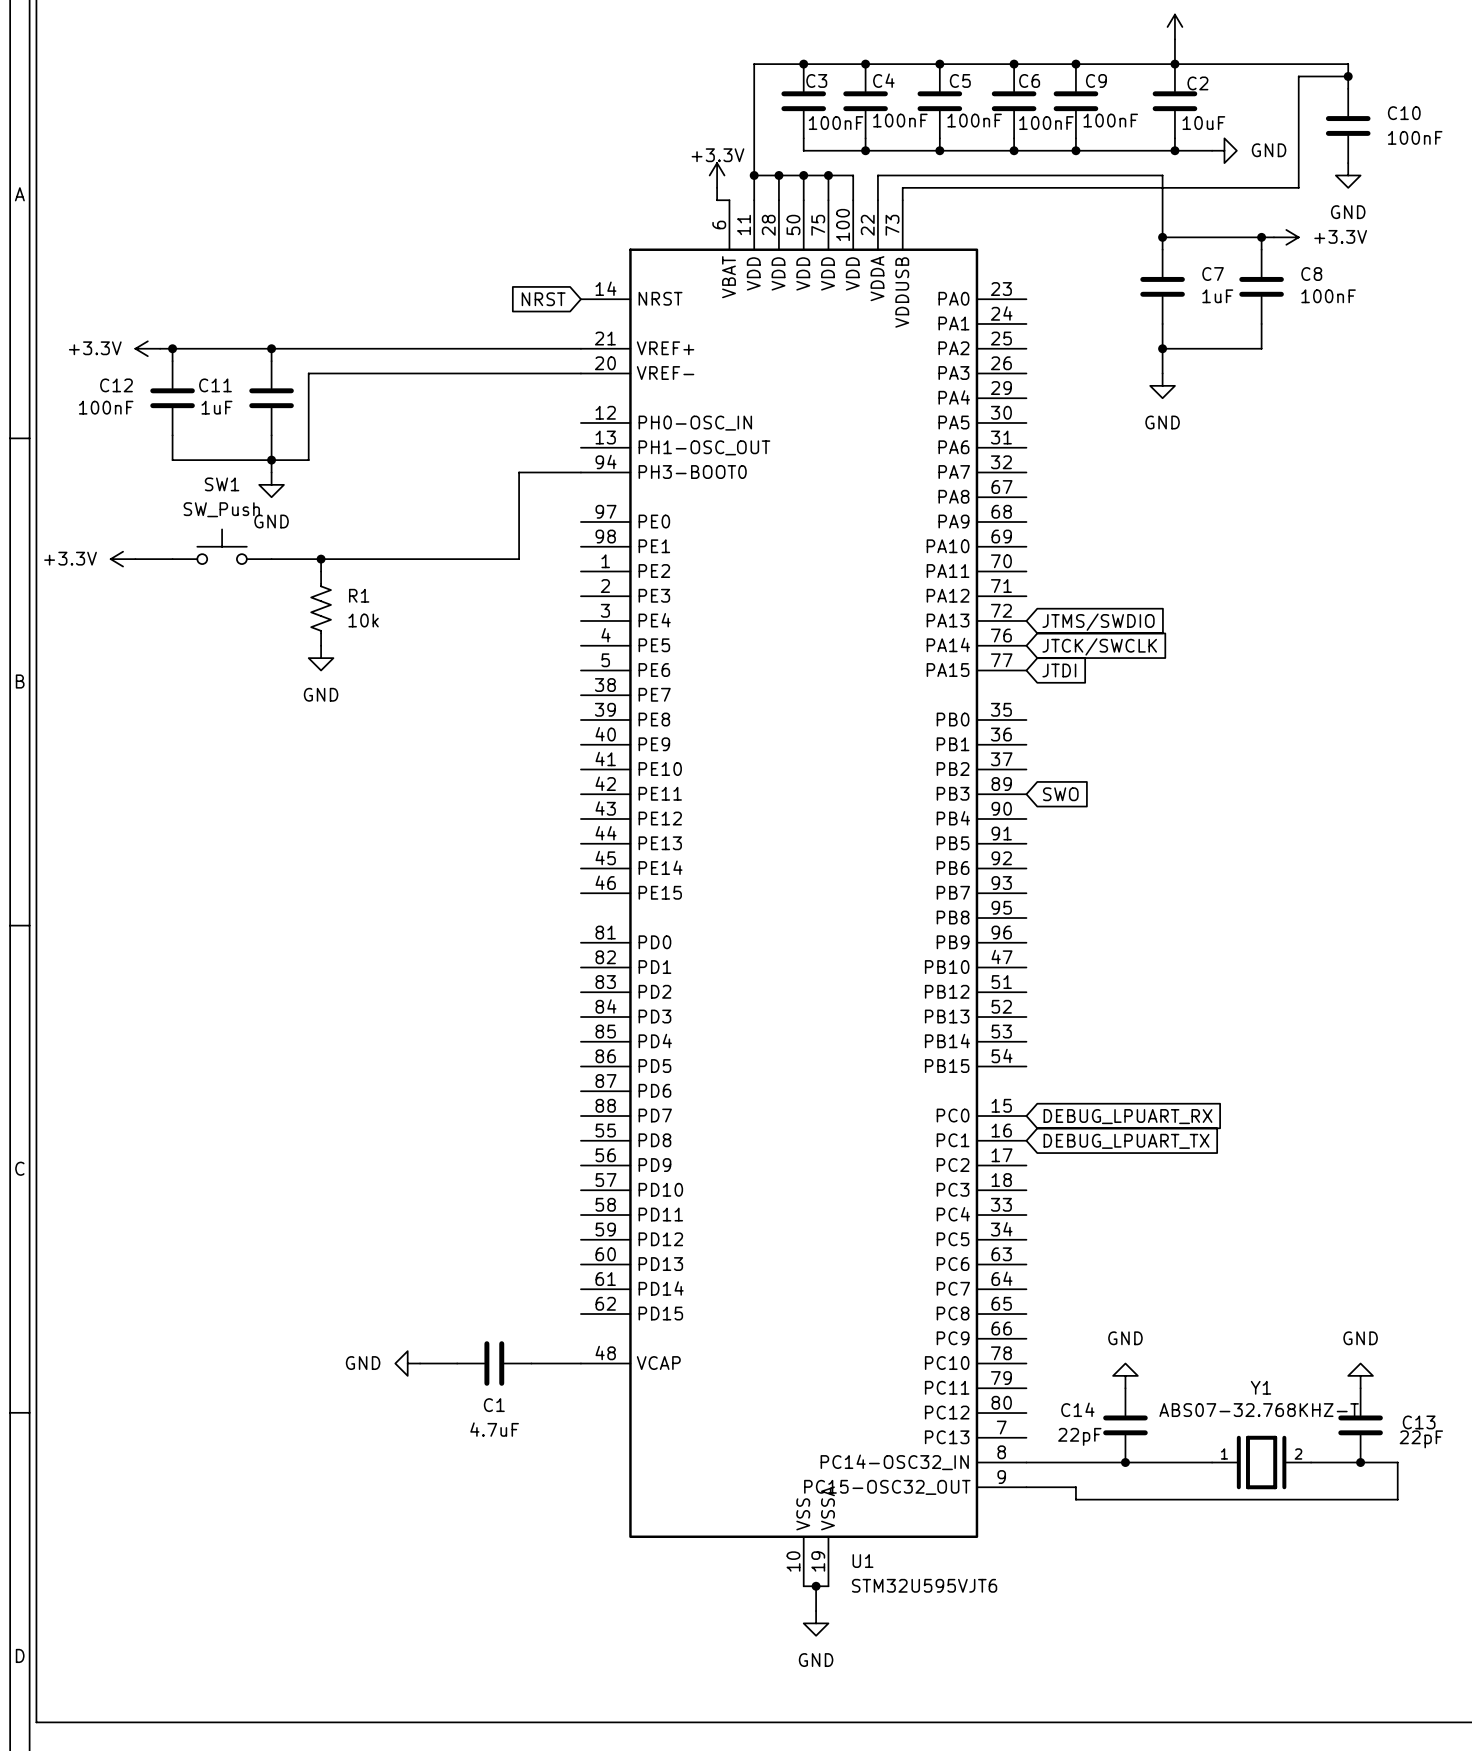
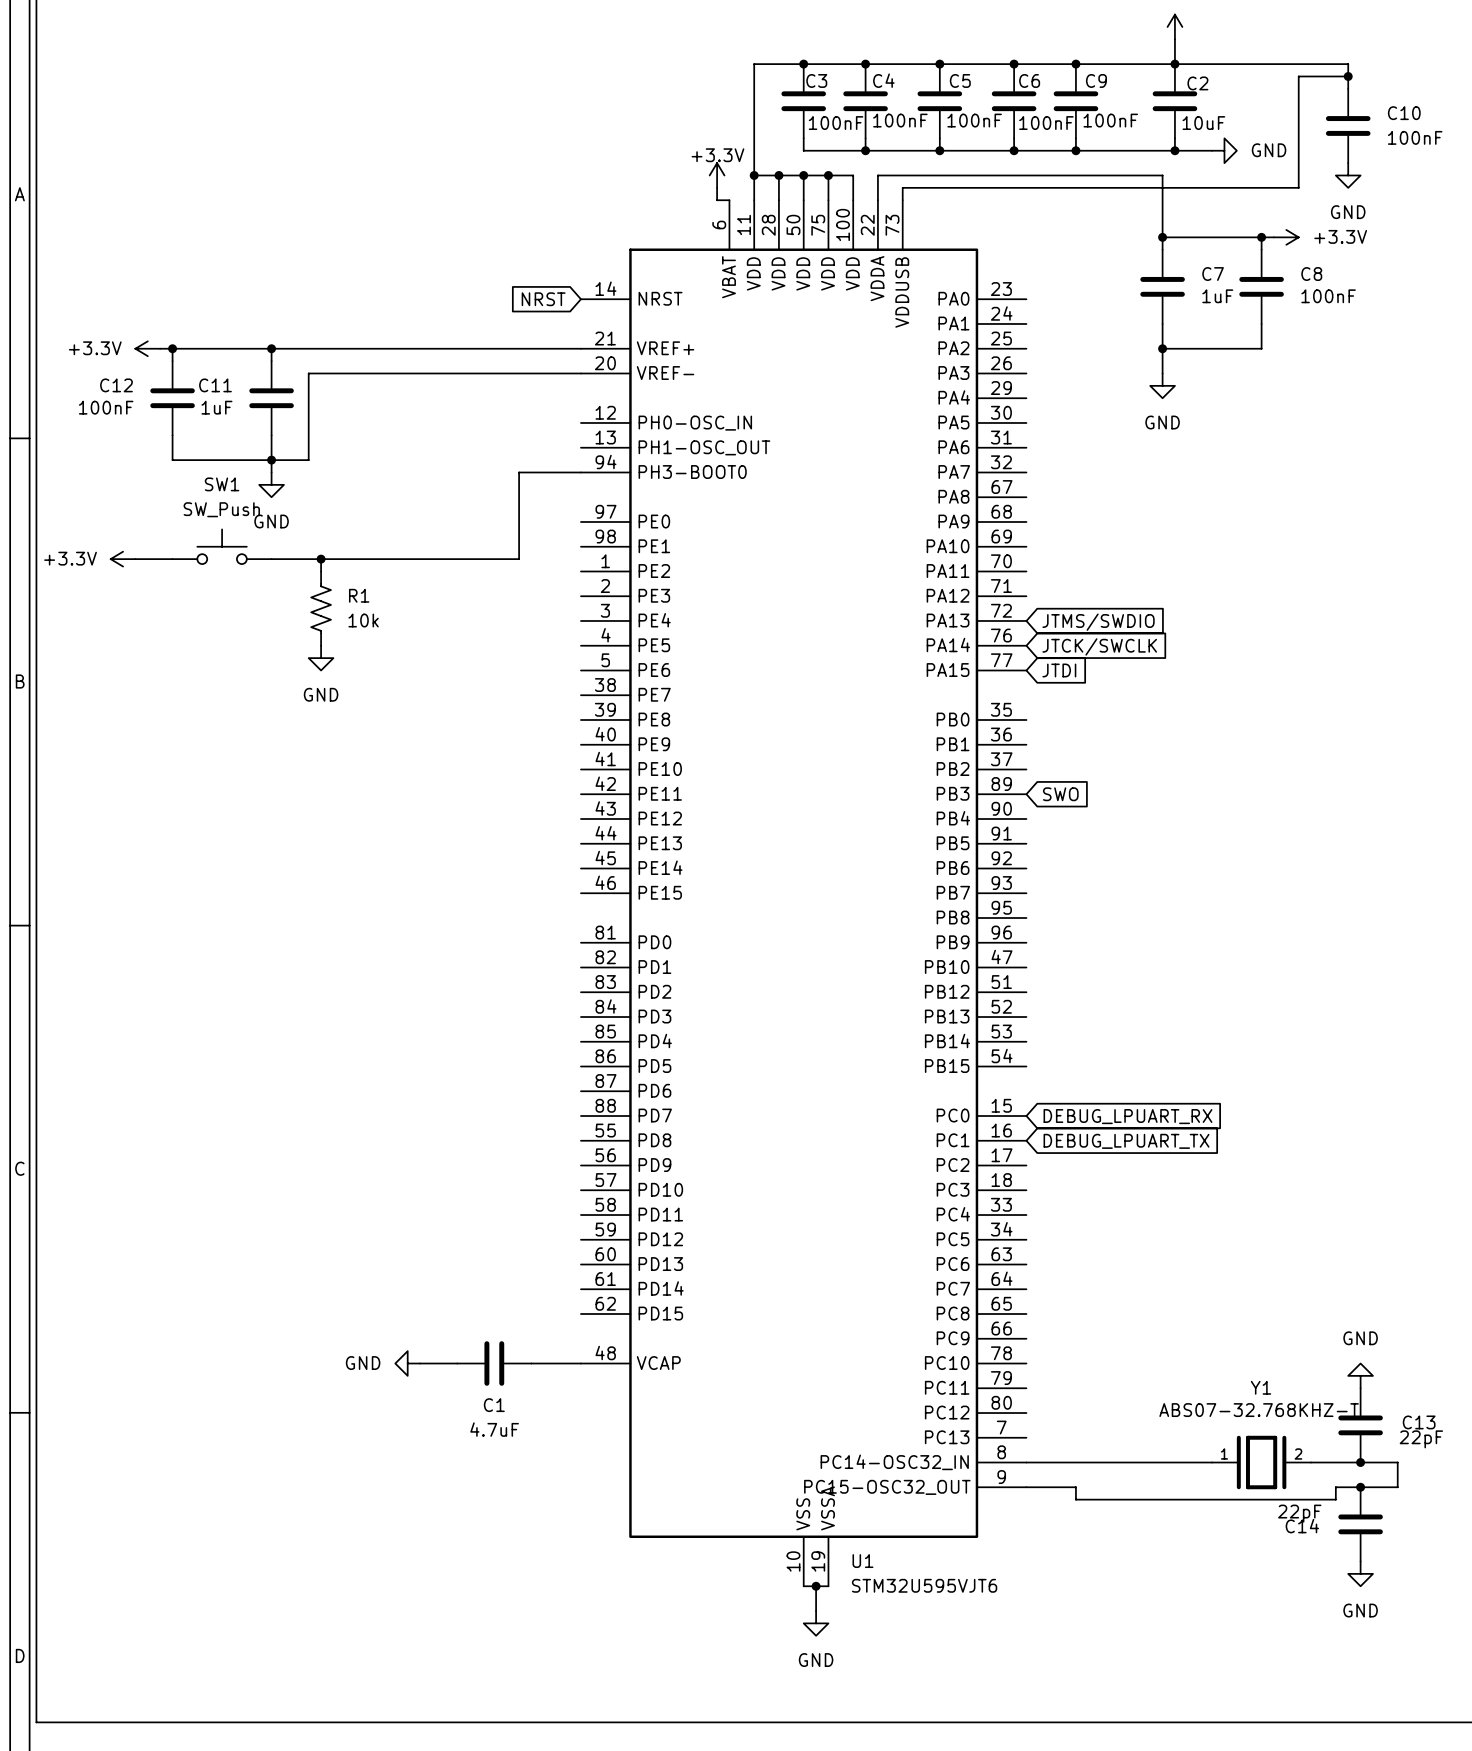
power symbol: GND (1125, 1375) -> none
C14 name position: C14 (1077, 1409) -> C14 (1302, 1526)
C14 position: (1125, 1425) -> (1360, 1524)
C14 value position: 22pF (1079, 1436) -> 22pF (1299, 1513)
junction: (1125, 1462) -> none
junction: none -> (1360, 1487)
wire: (1397, 1487) (1397, 1499) (1335, 1499) -> (1397, 1487) (1335, 1487) (1335, 1499)
power symbol: none -> GND (1360, 1573)

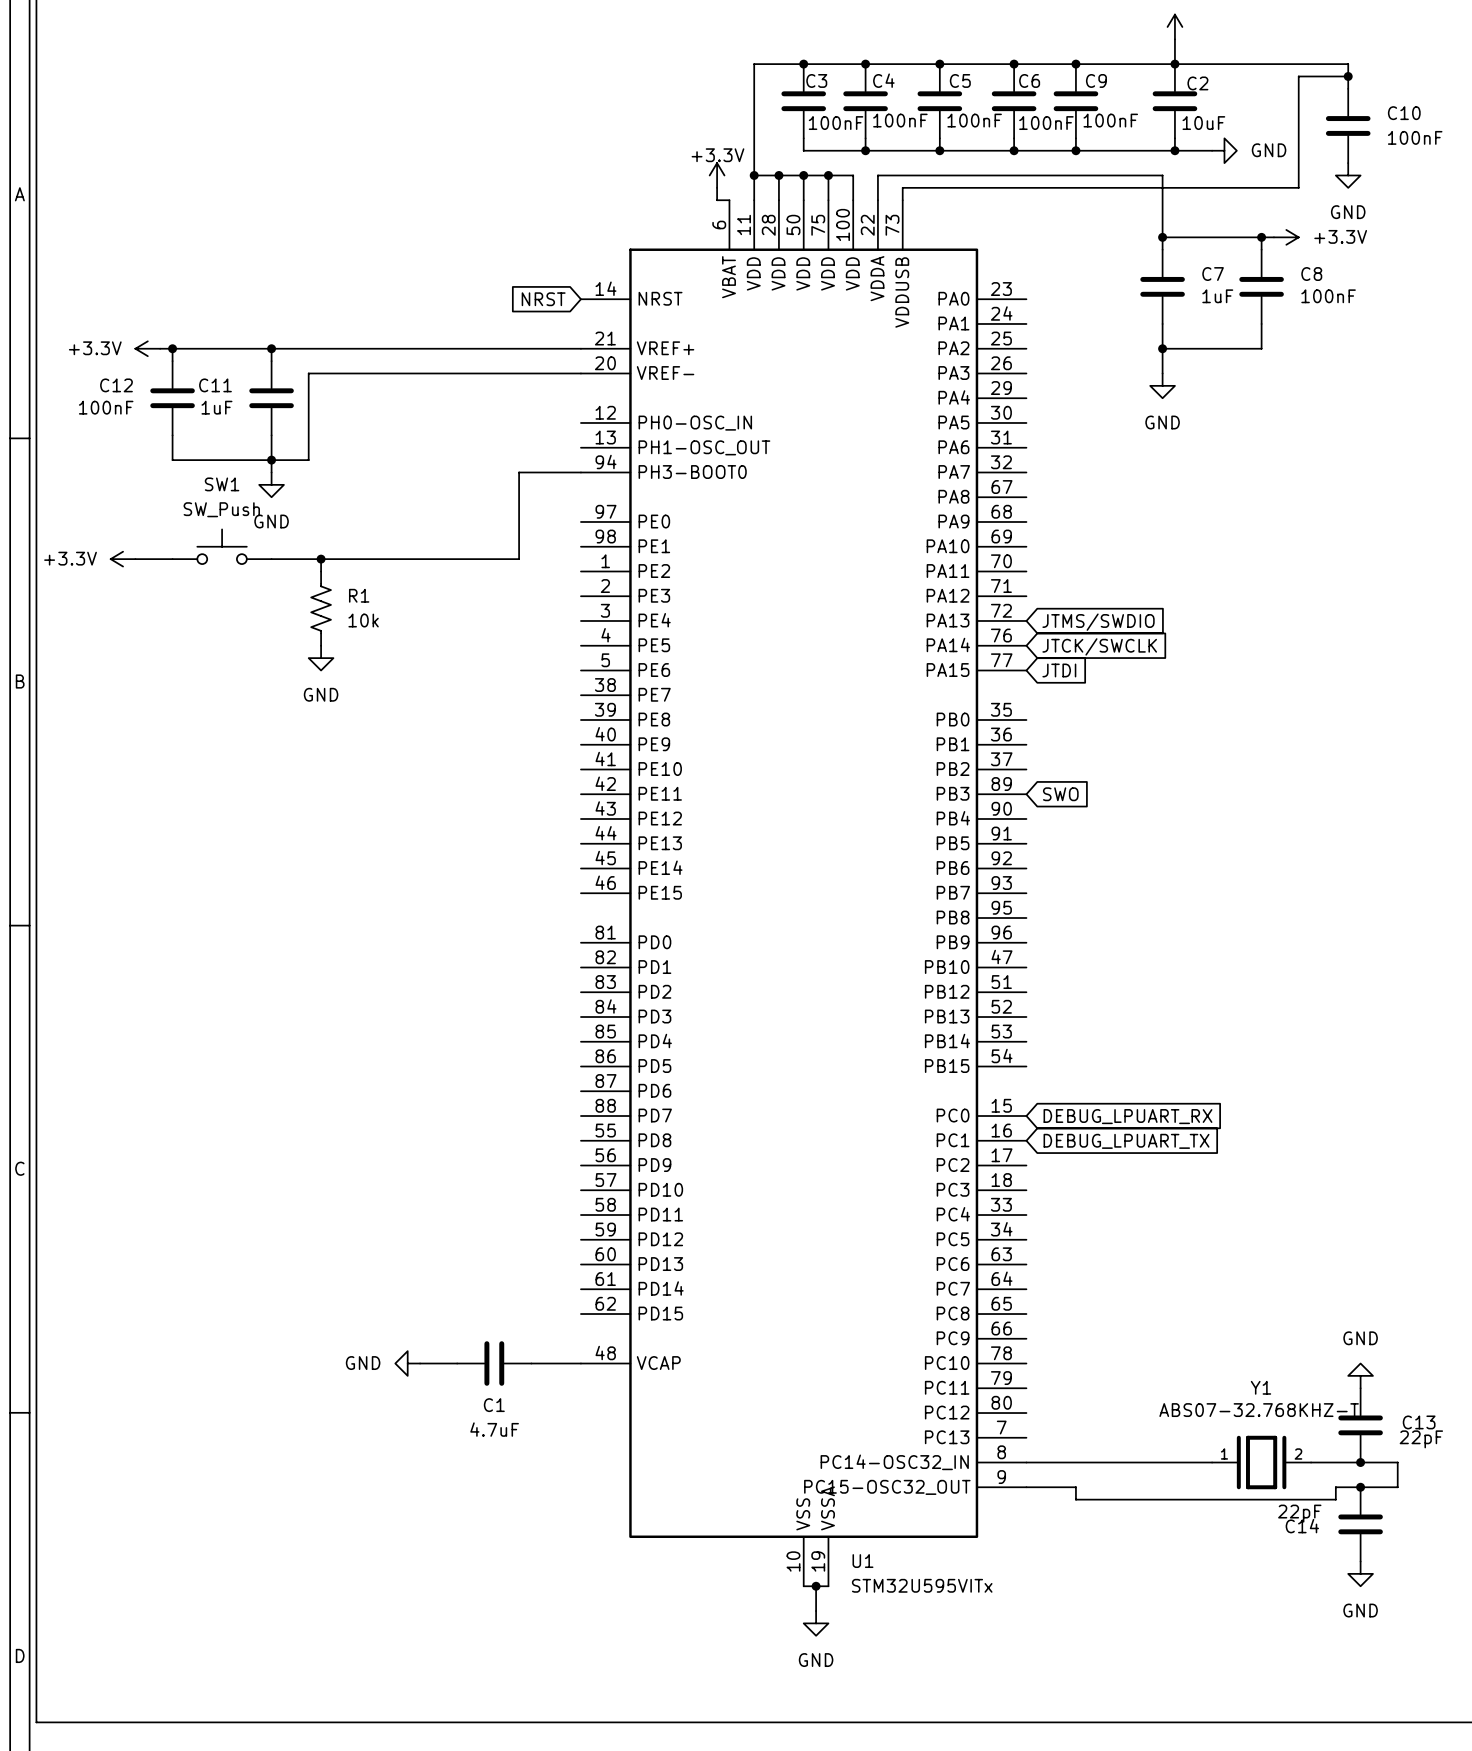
U1 value: STM32U595VJT6 (924, 1585) -> STM32U595VITx (922, 1585)

